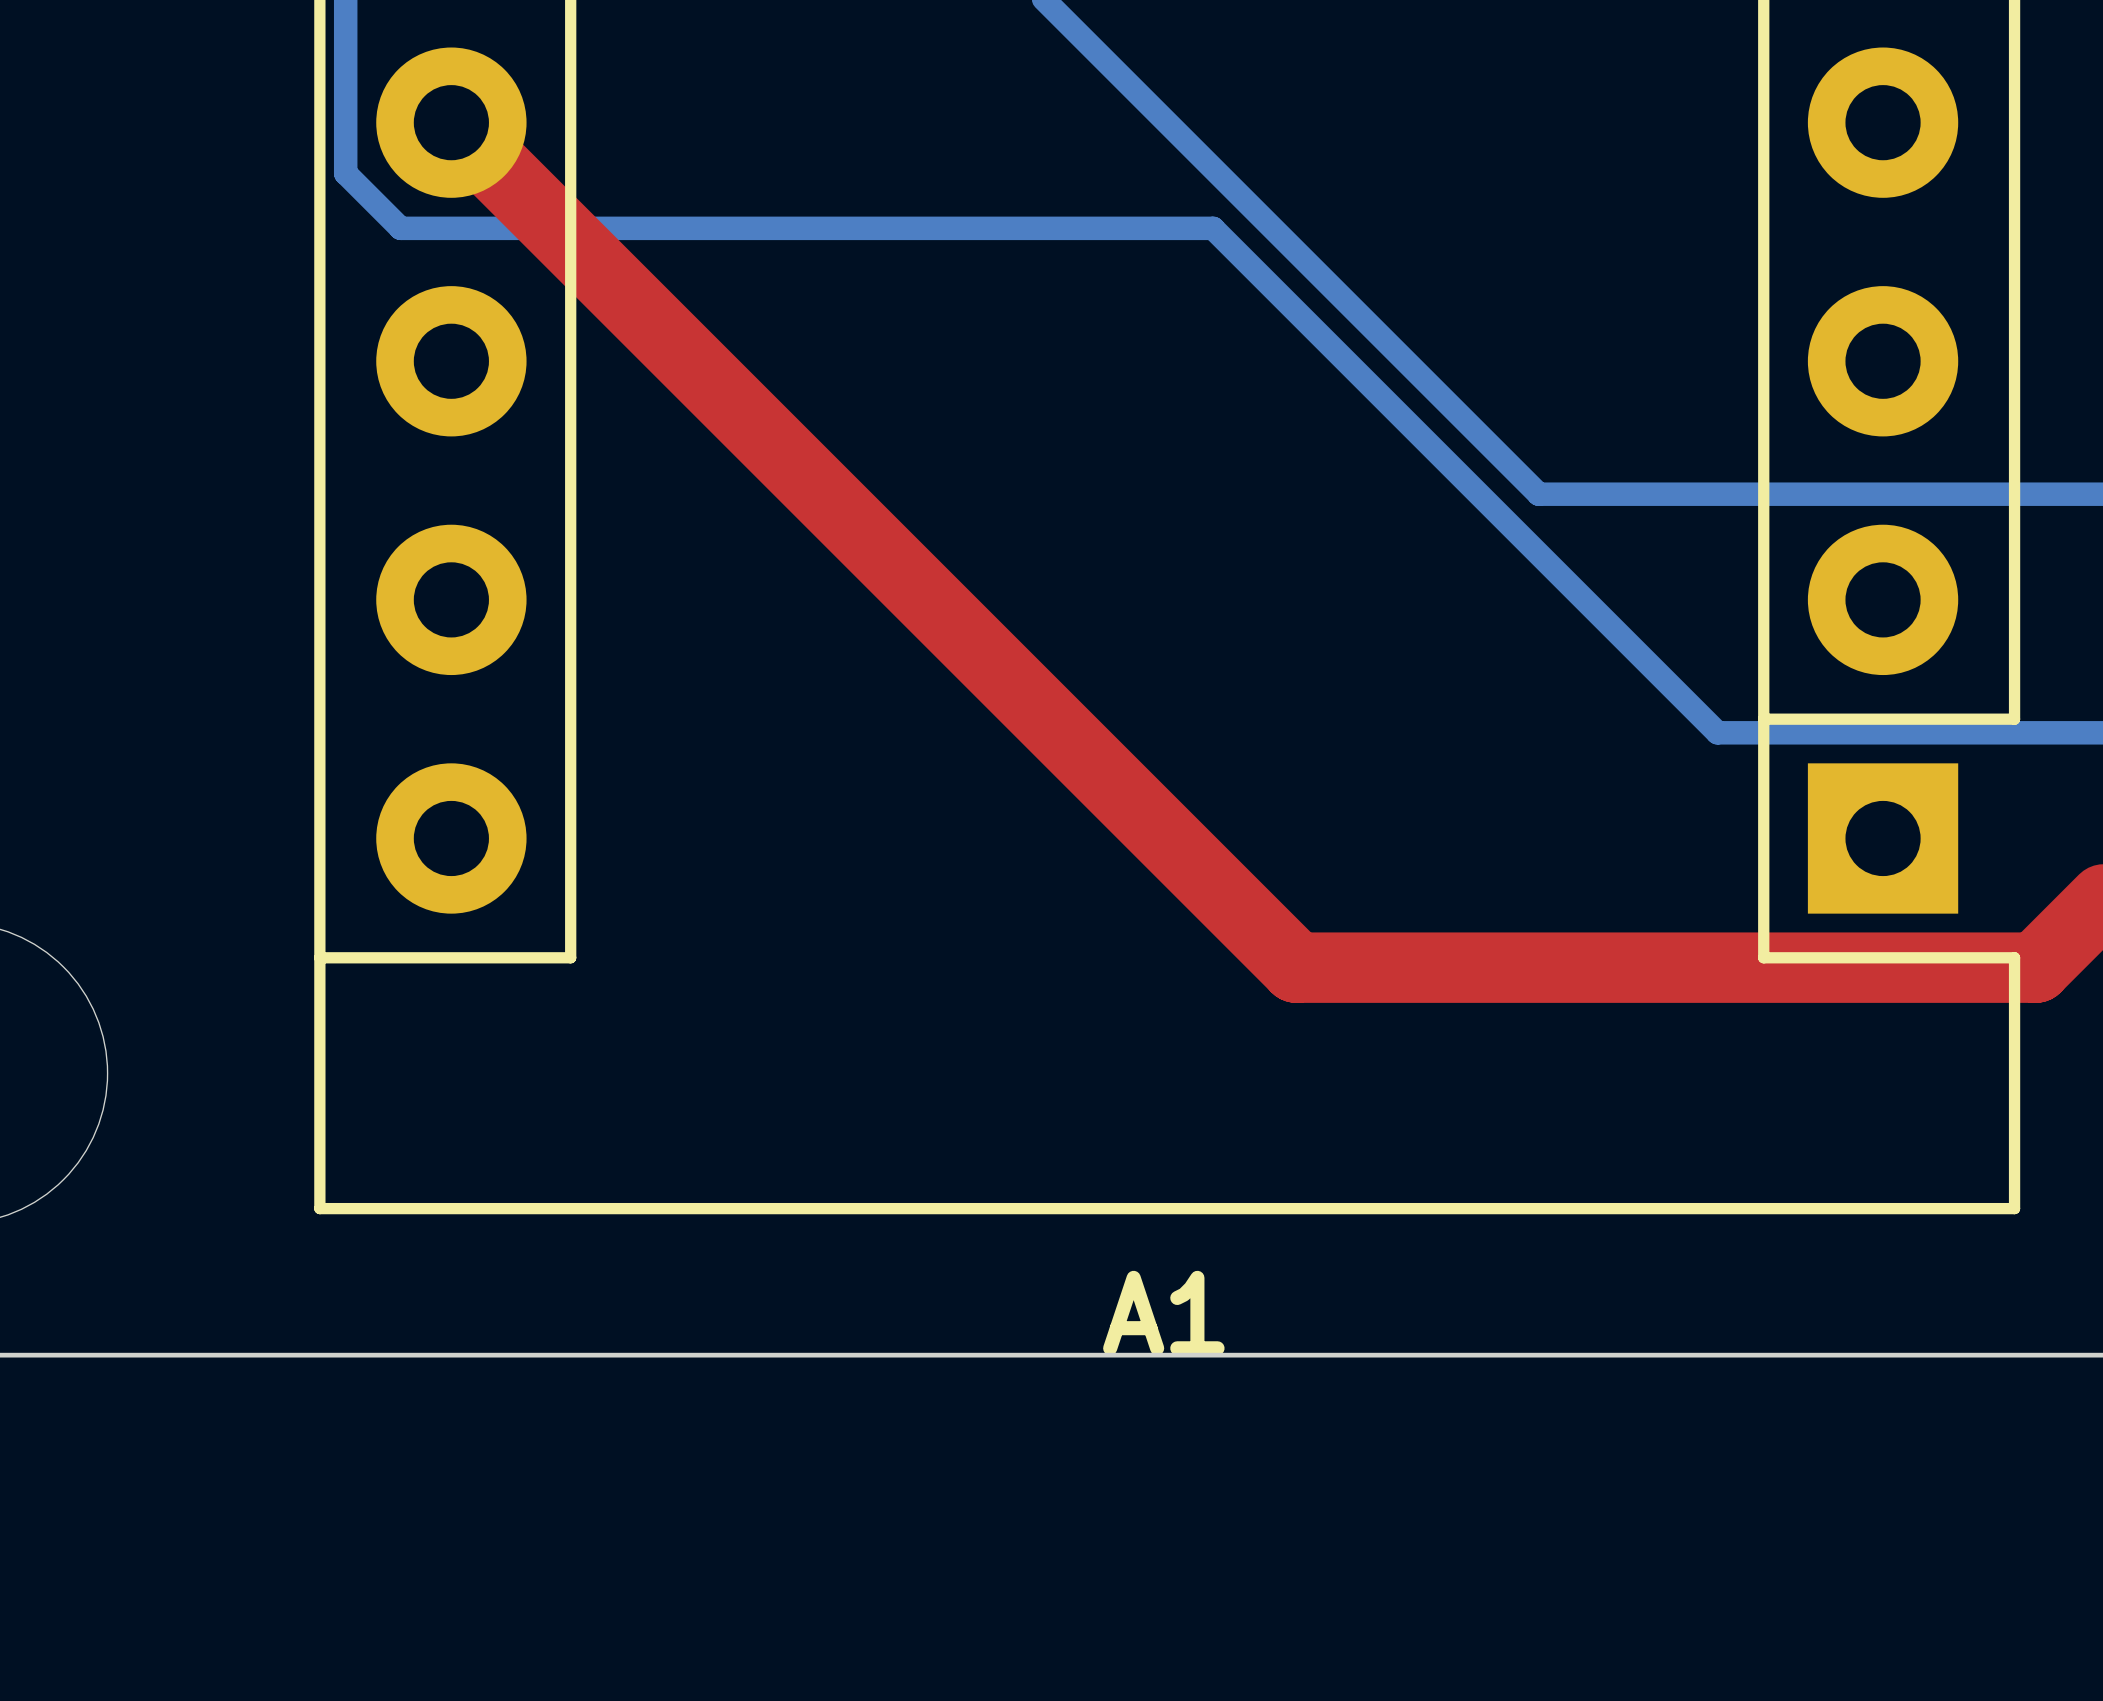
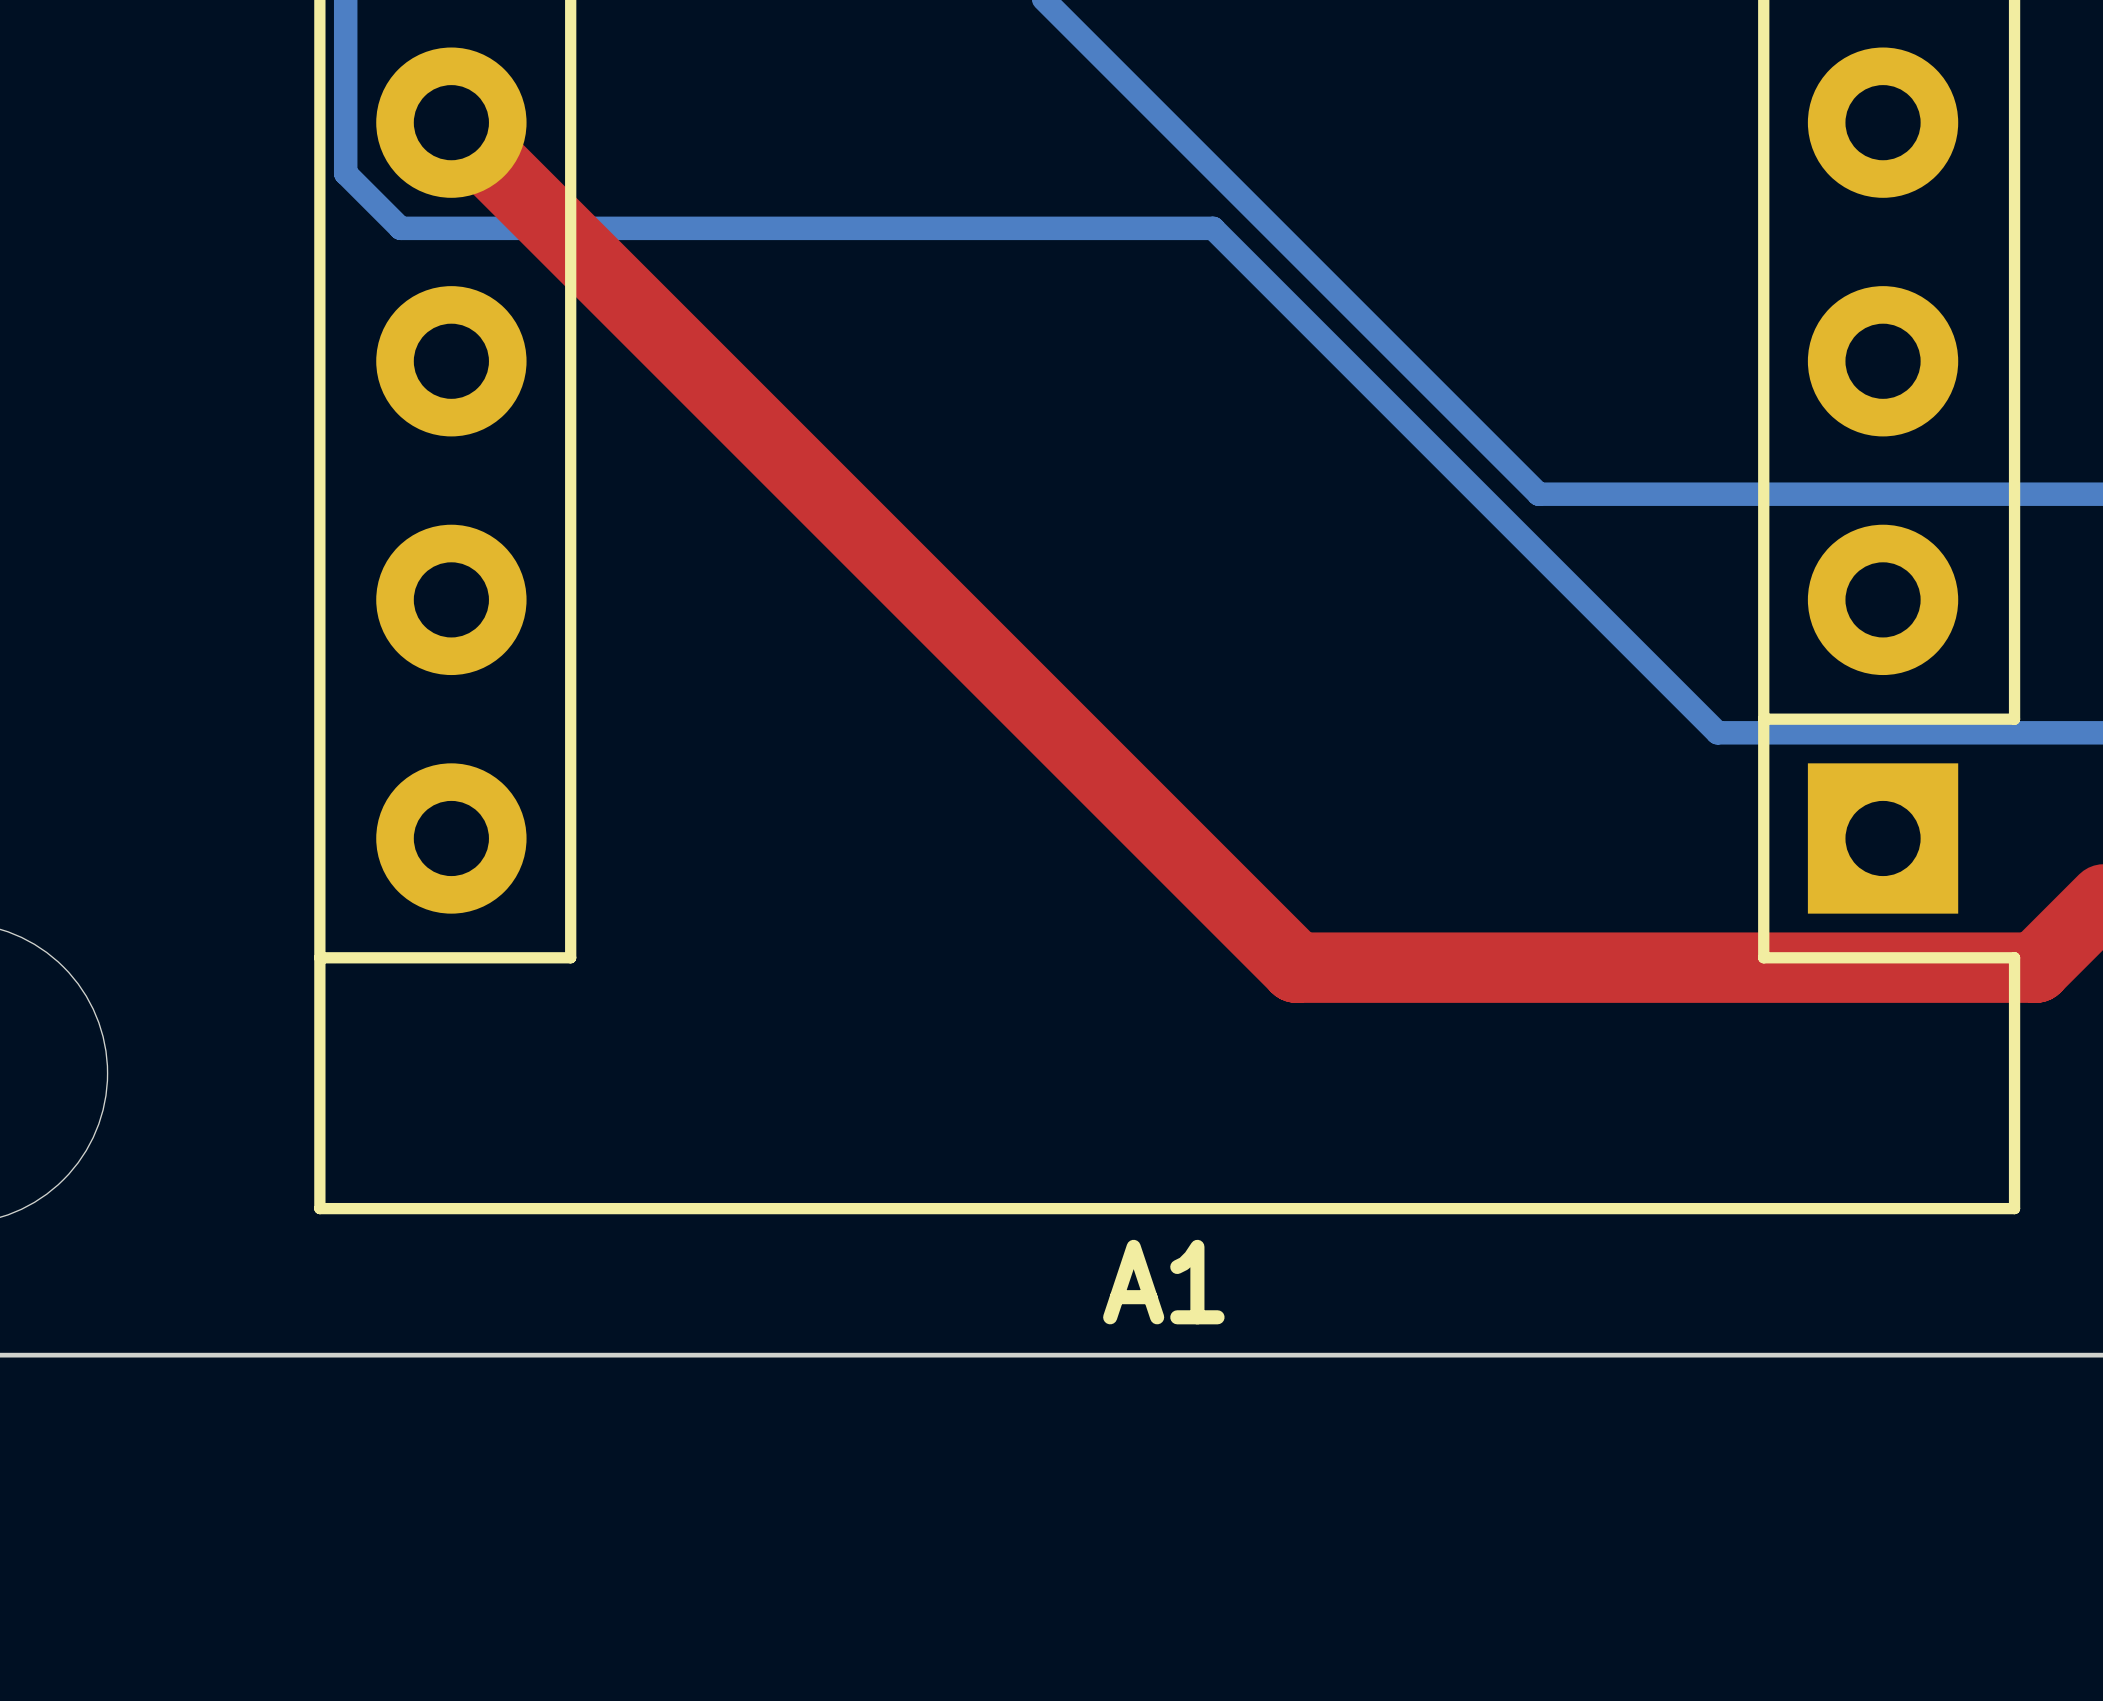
A1 name position: A1 (1163, 1313) -> A1 (1163, 1282)

